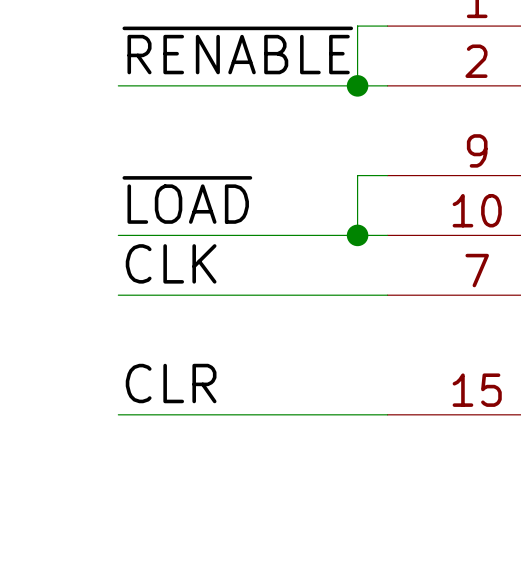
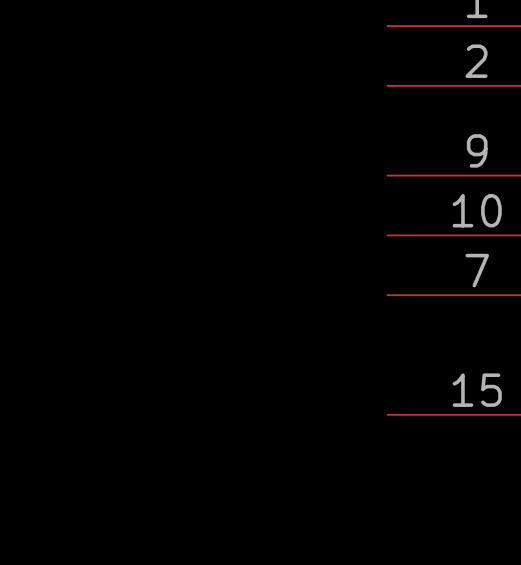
wire: (387, 26) (357, 26) (357, 85) -> none
label: ~{RENABLE} (237, 50) -> none
wire: (118, 85) (387, 85) -> none
junction: (357, 85) -> none
wire: (387, 175) (357, 175) (357, 235) -> none
label: ~{LOAD} (187, 199) -> none
wire: (118, 235) (387, 235) -> none
junction: (357, 235) -> none
label: CLK (171, 263) -> none
wire: (118, 295) (387, 295) -> none
label: CLR (171, 383) -> none
wire: (118, 414) (387, 414) -> none

